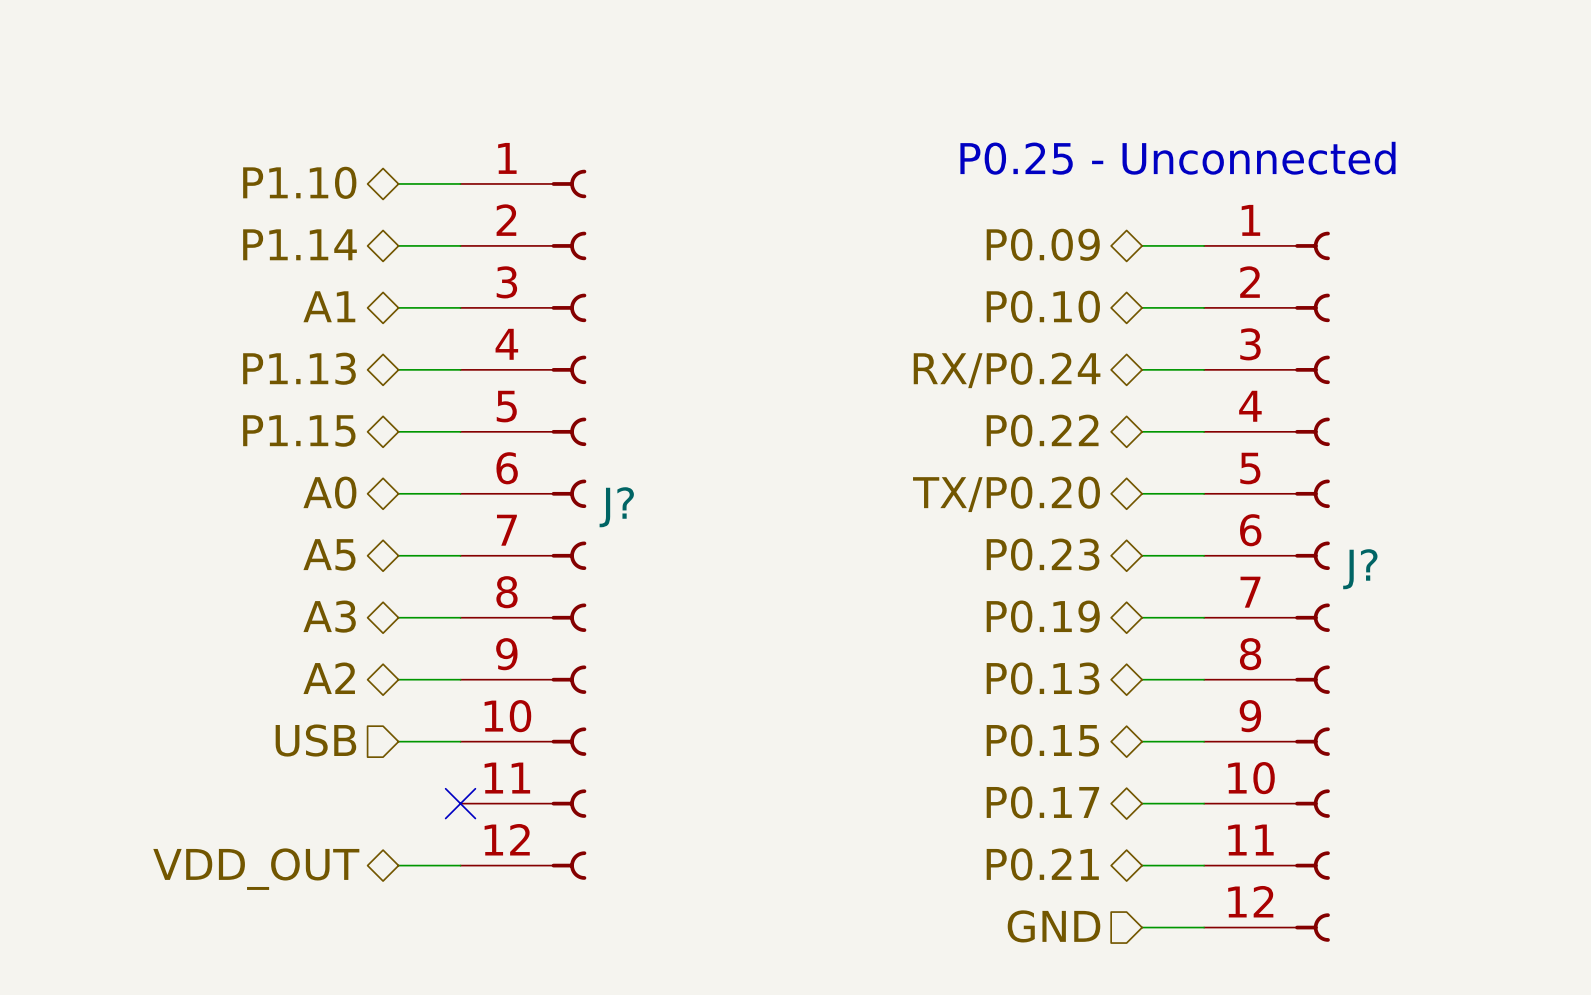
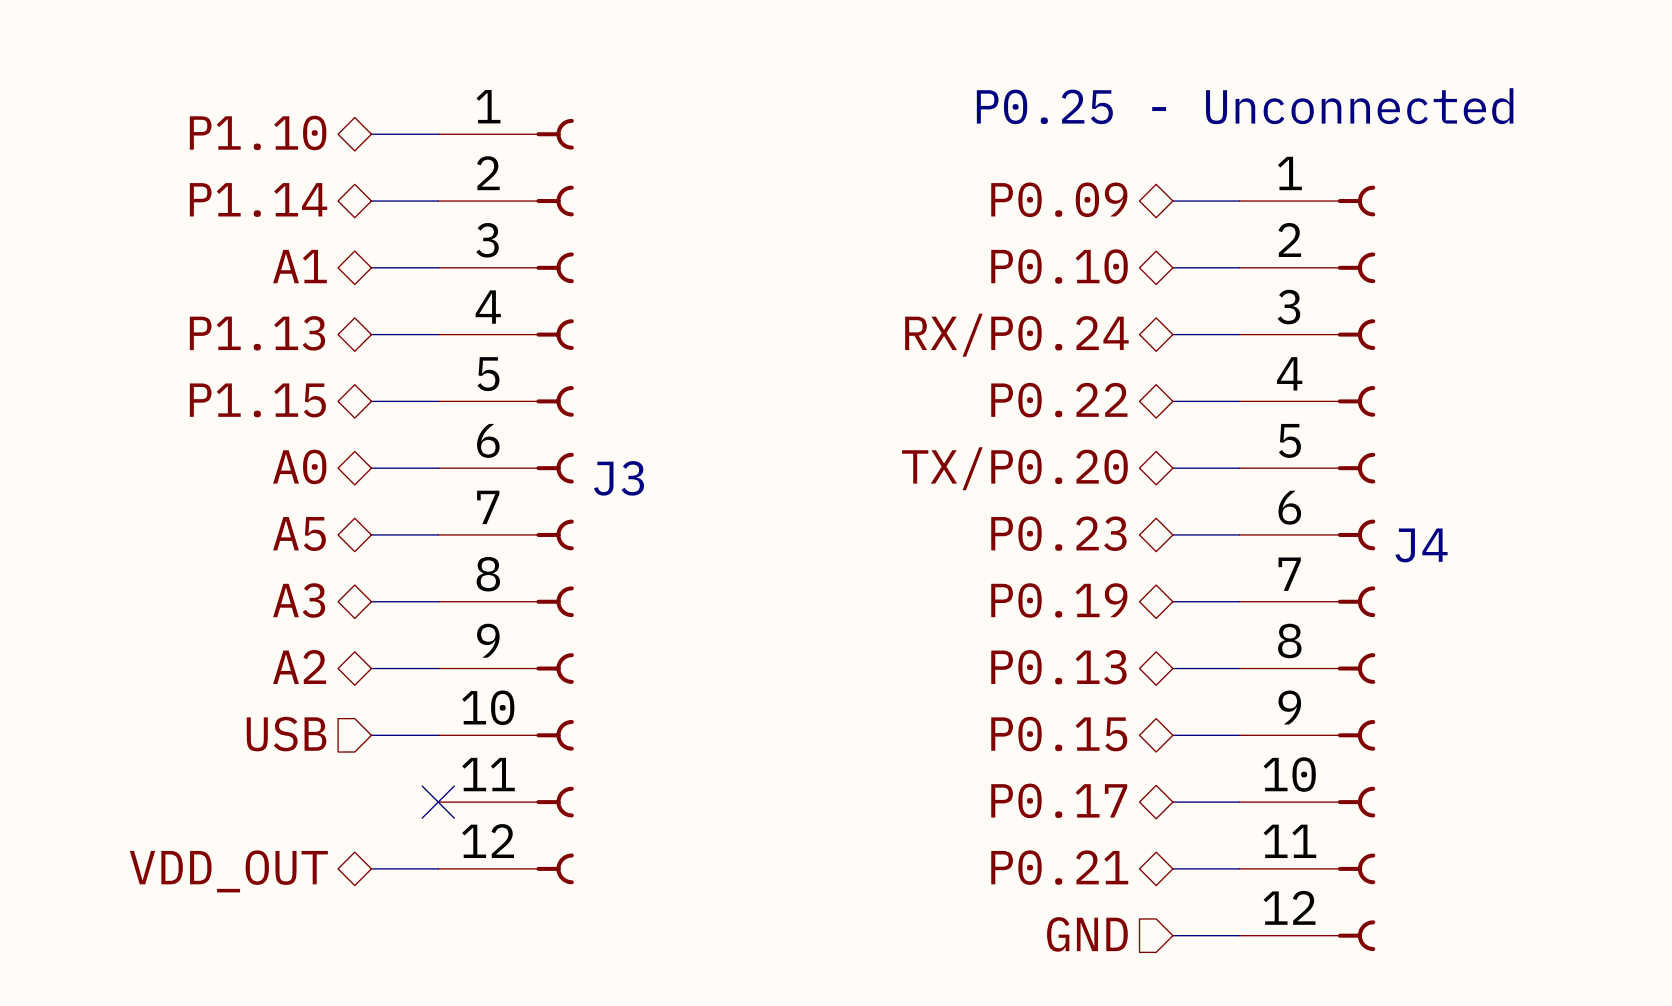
J? name: J? (616, 507) -> J3 (619, 478)
J? name: J? (1360, 569) -> J4 (1421, 545)

